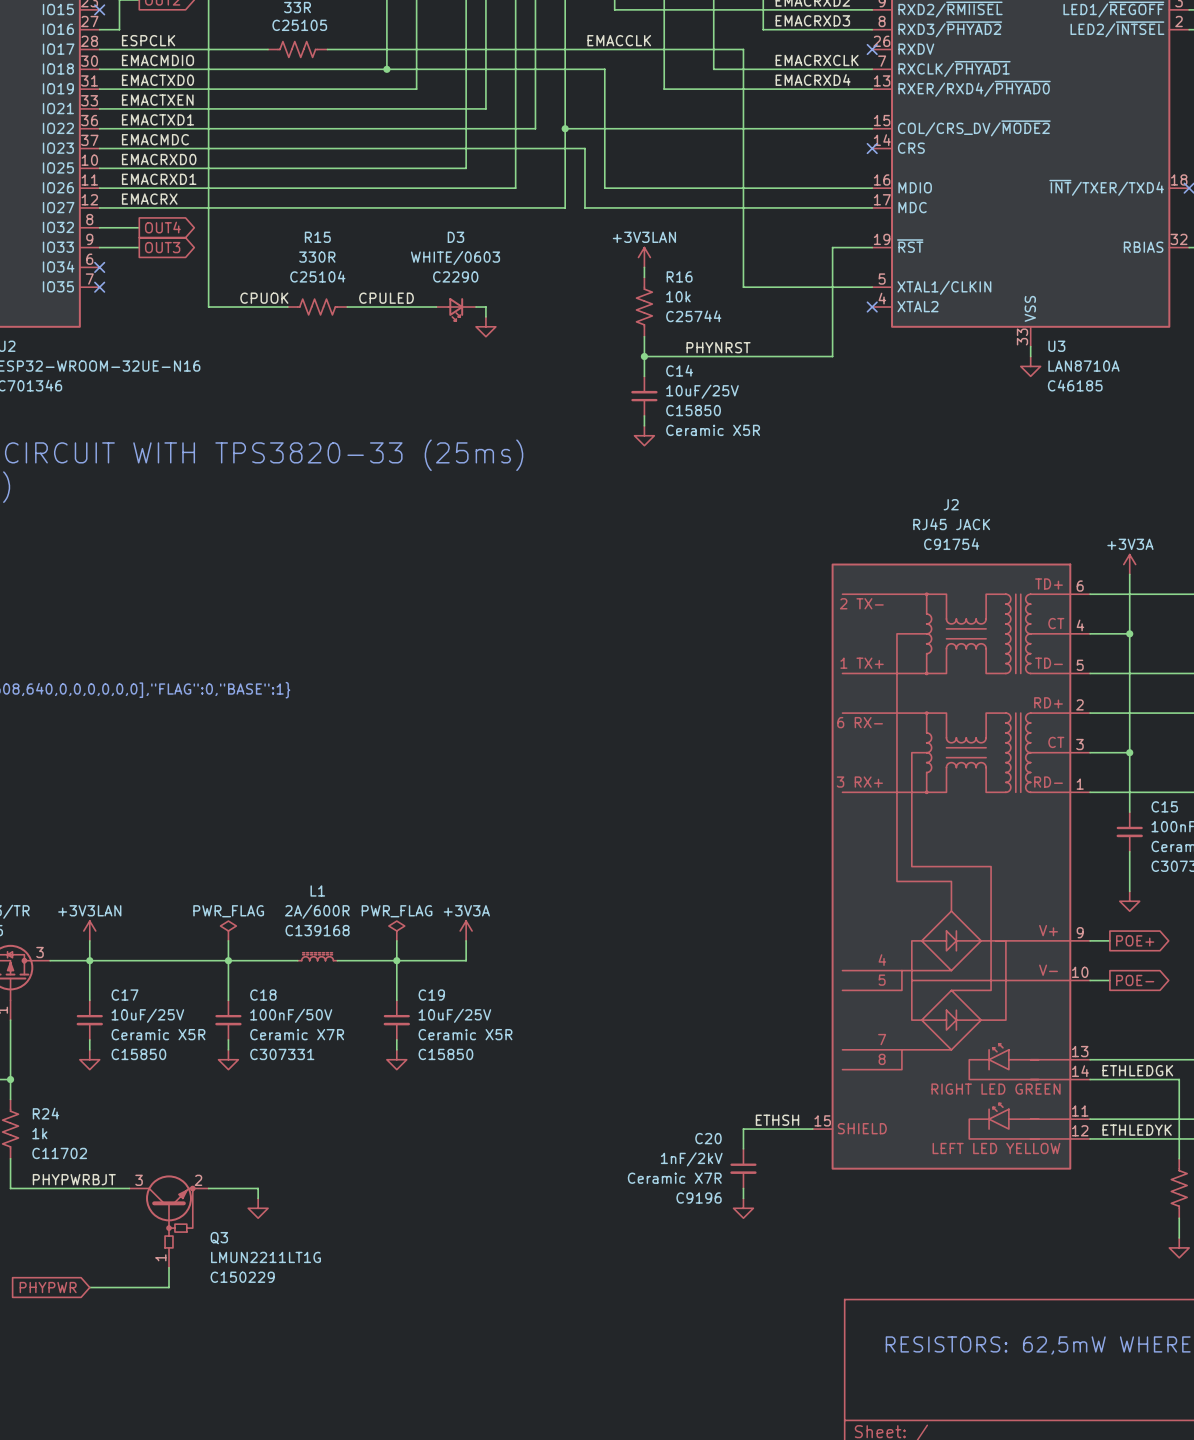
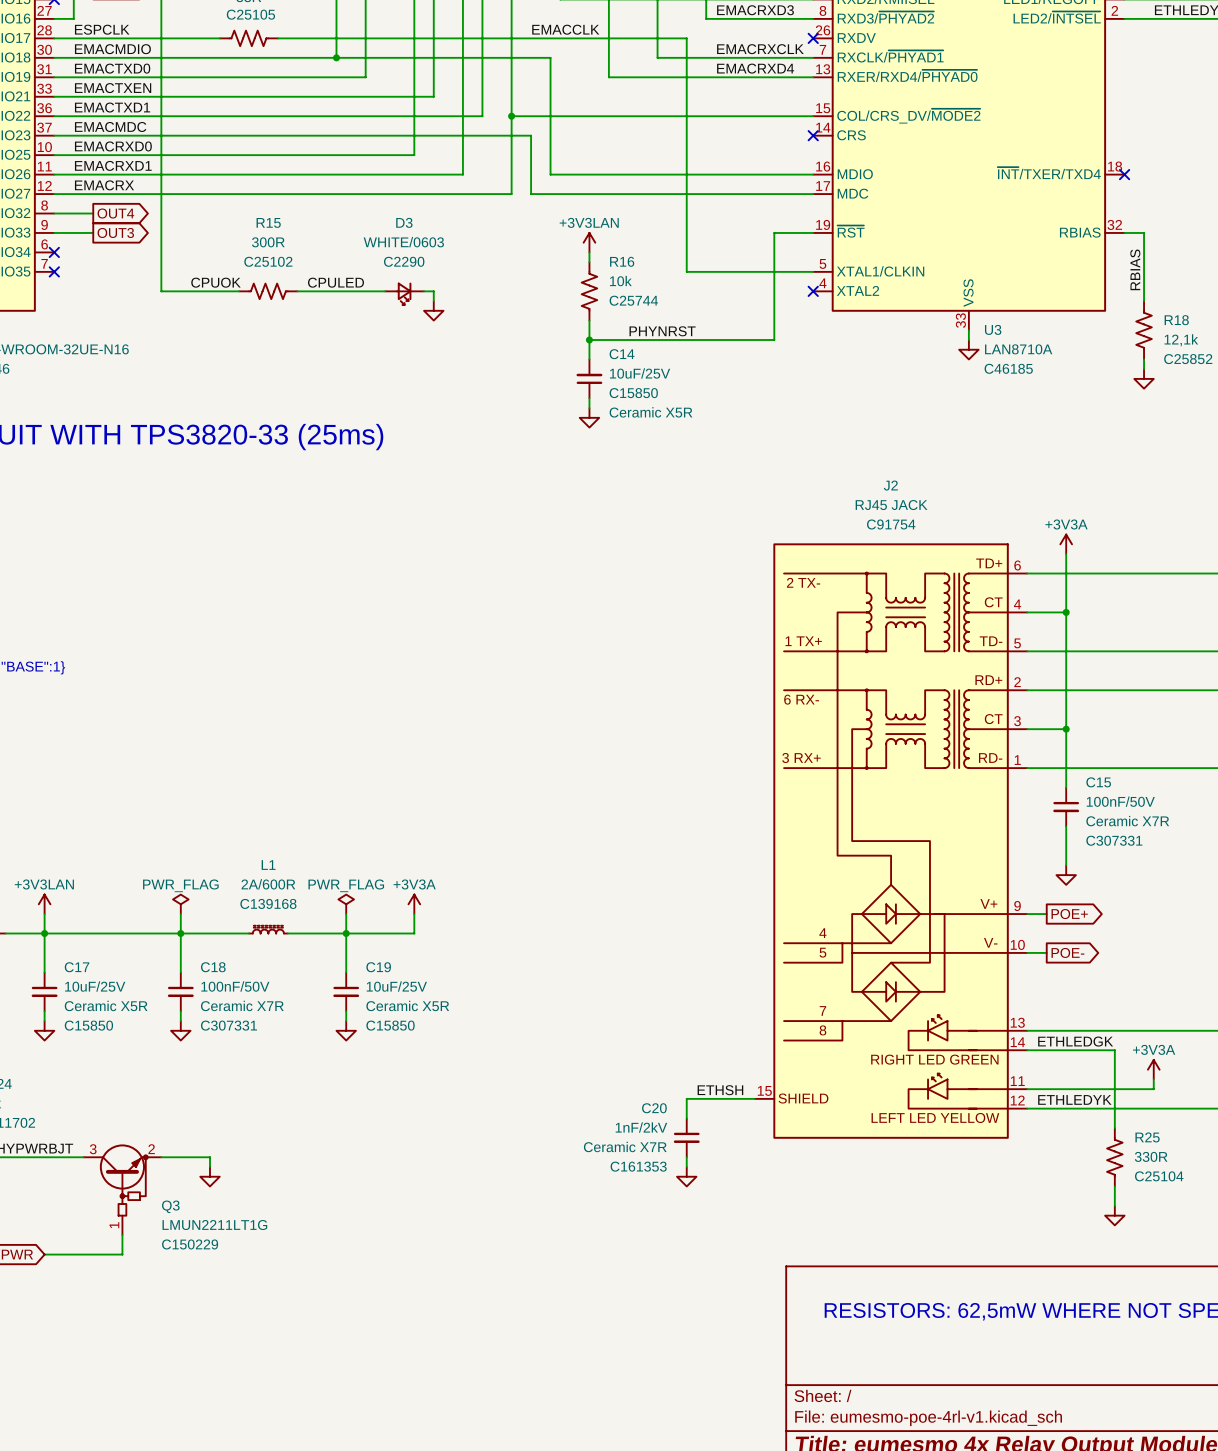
R15 value: 330R (317, 257) -> 300R (268, 242)
R15 text: C25104 (317, 276) -> C25102 (268, 261)
C20 text: C9196 (699, 1198) -> C161353 (638, 1166)

